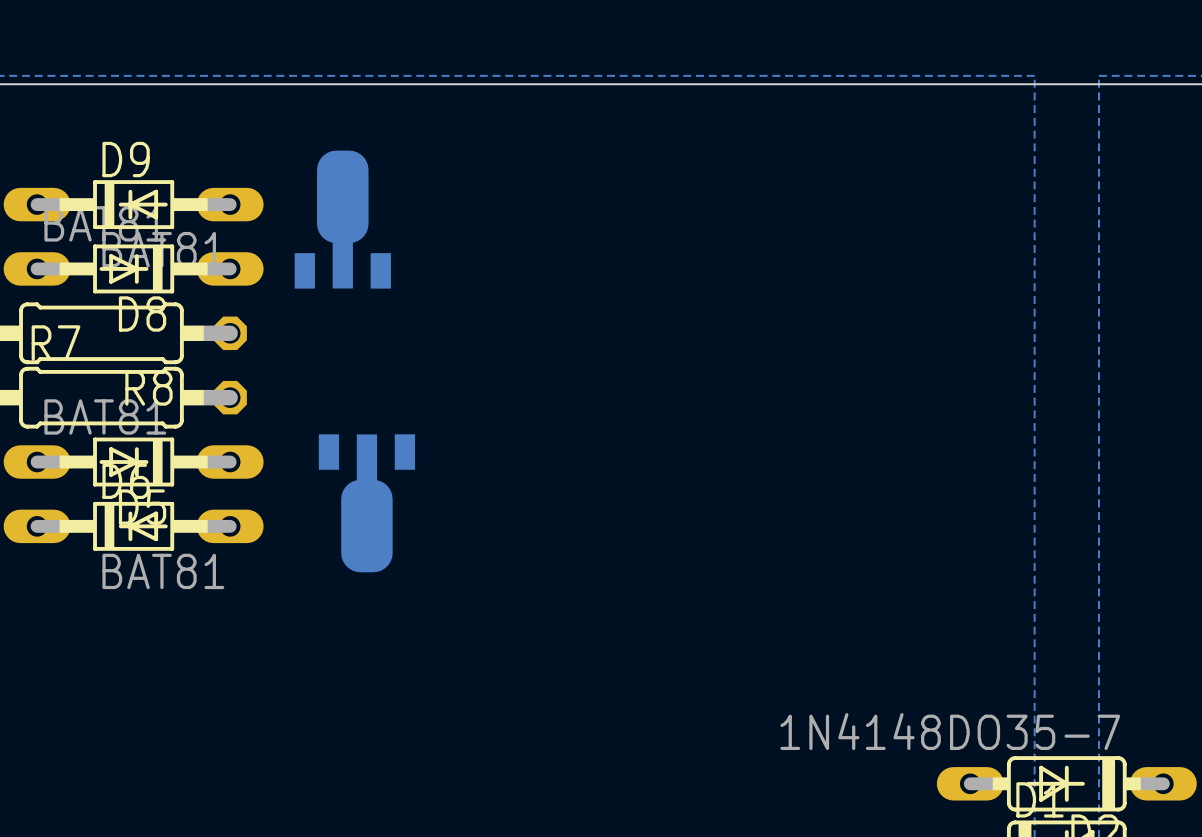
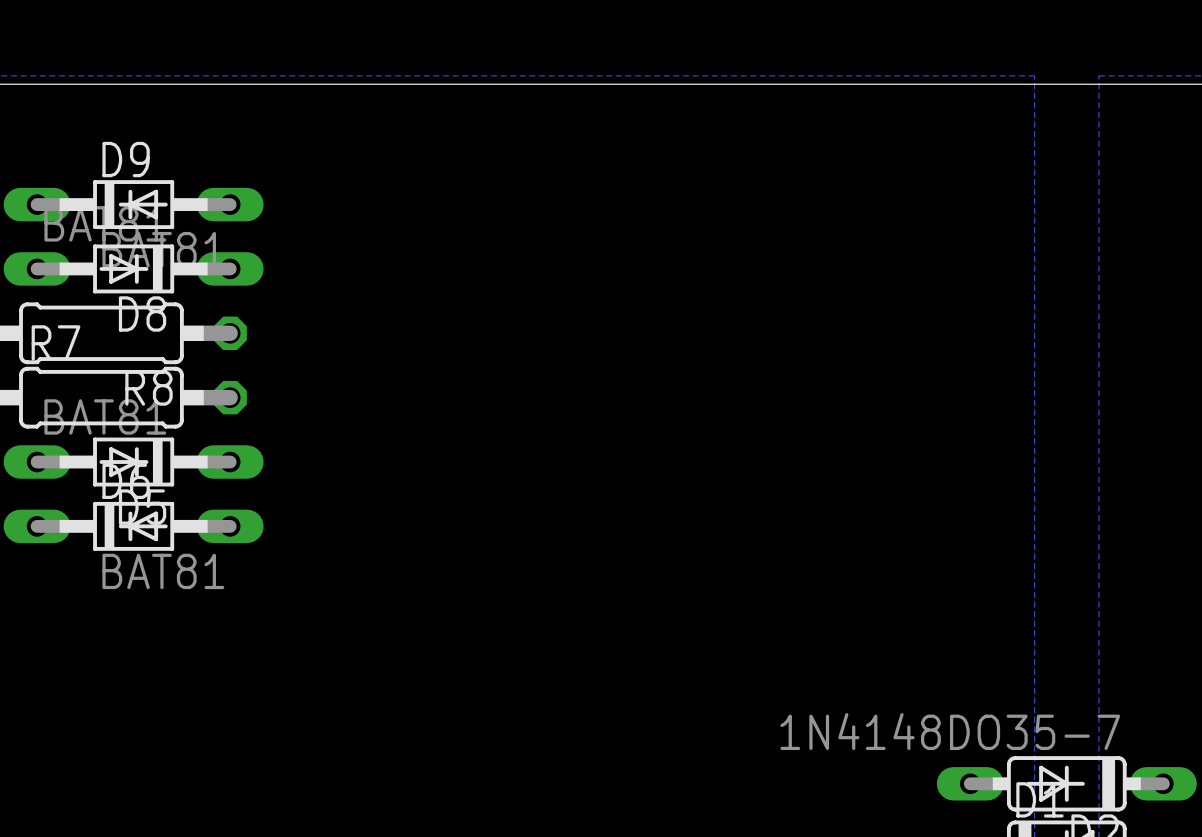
part: (342, 219) -> none
part: (366, 503) -> none

